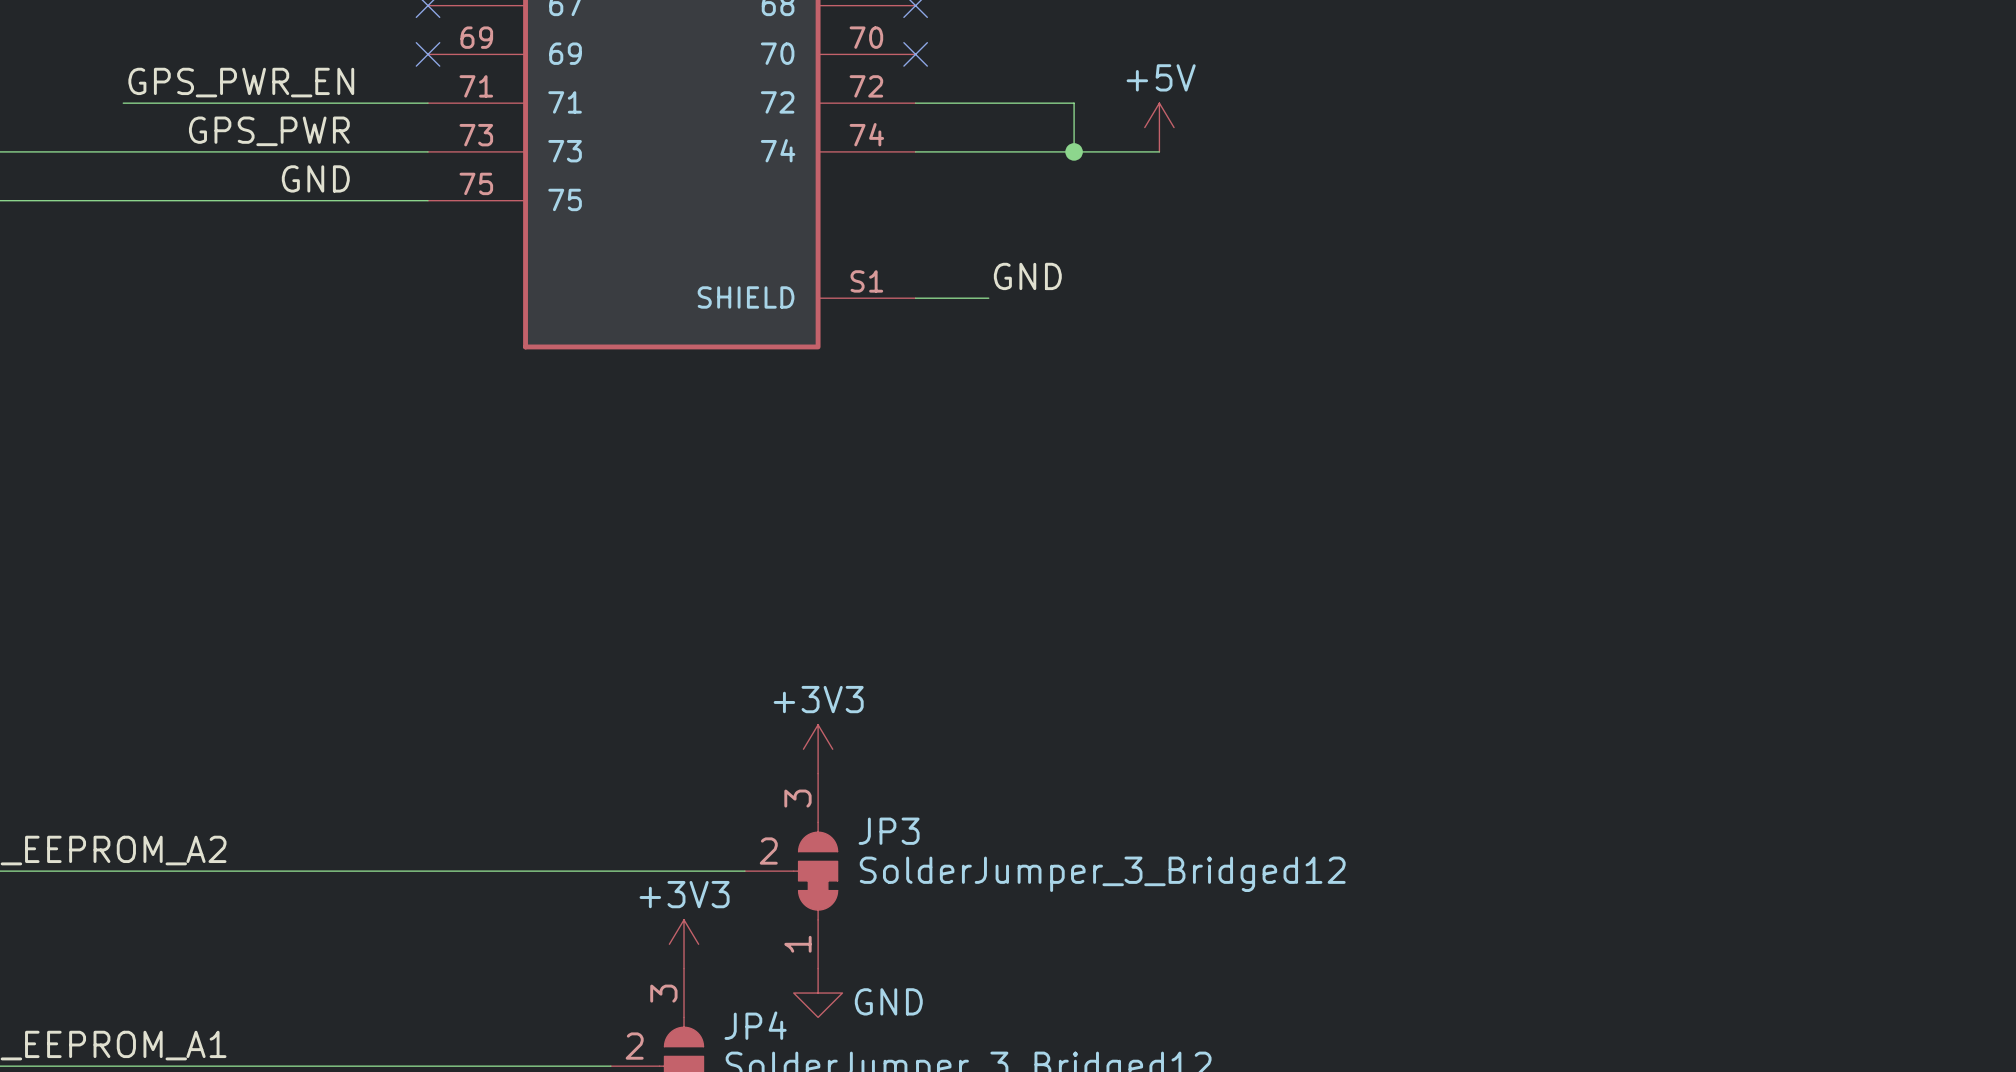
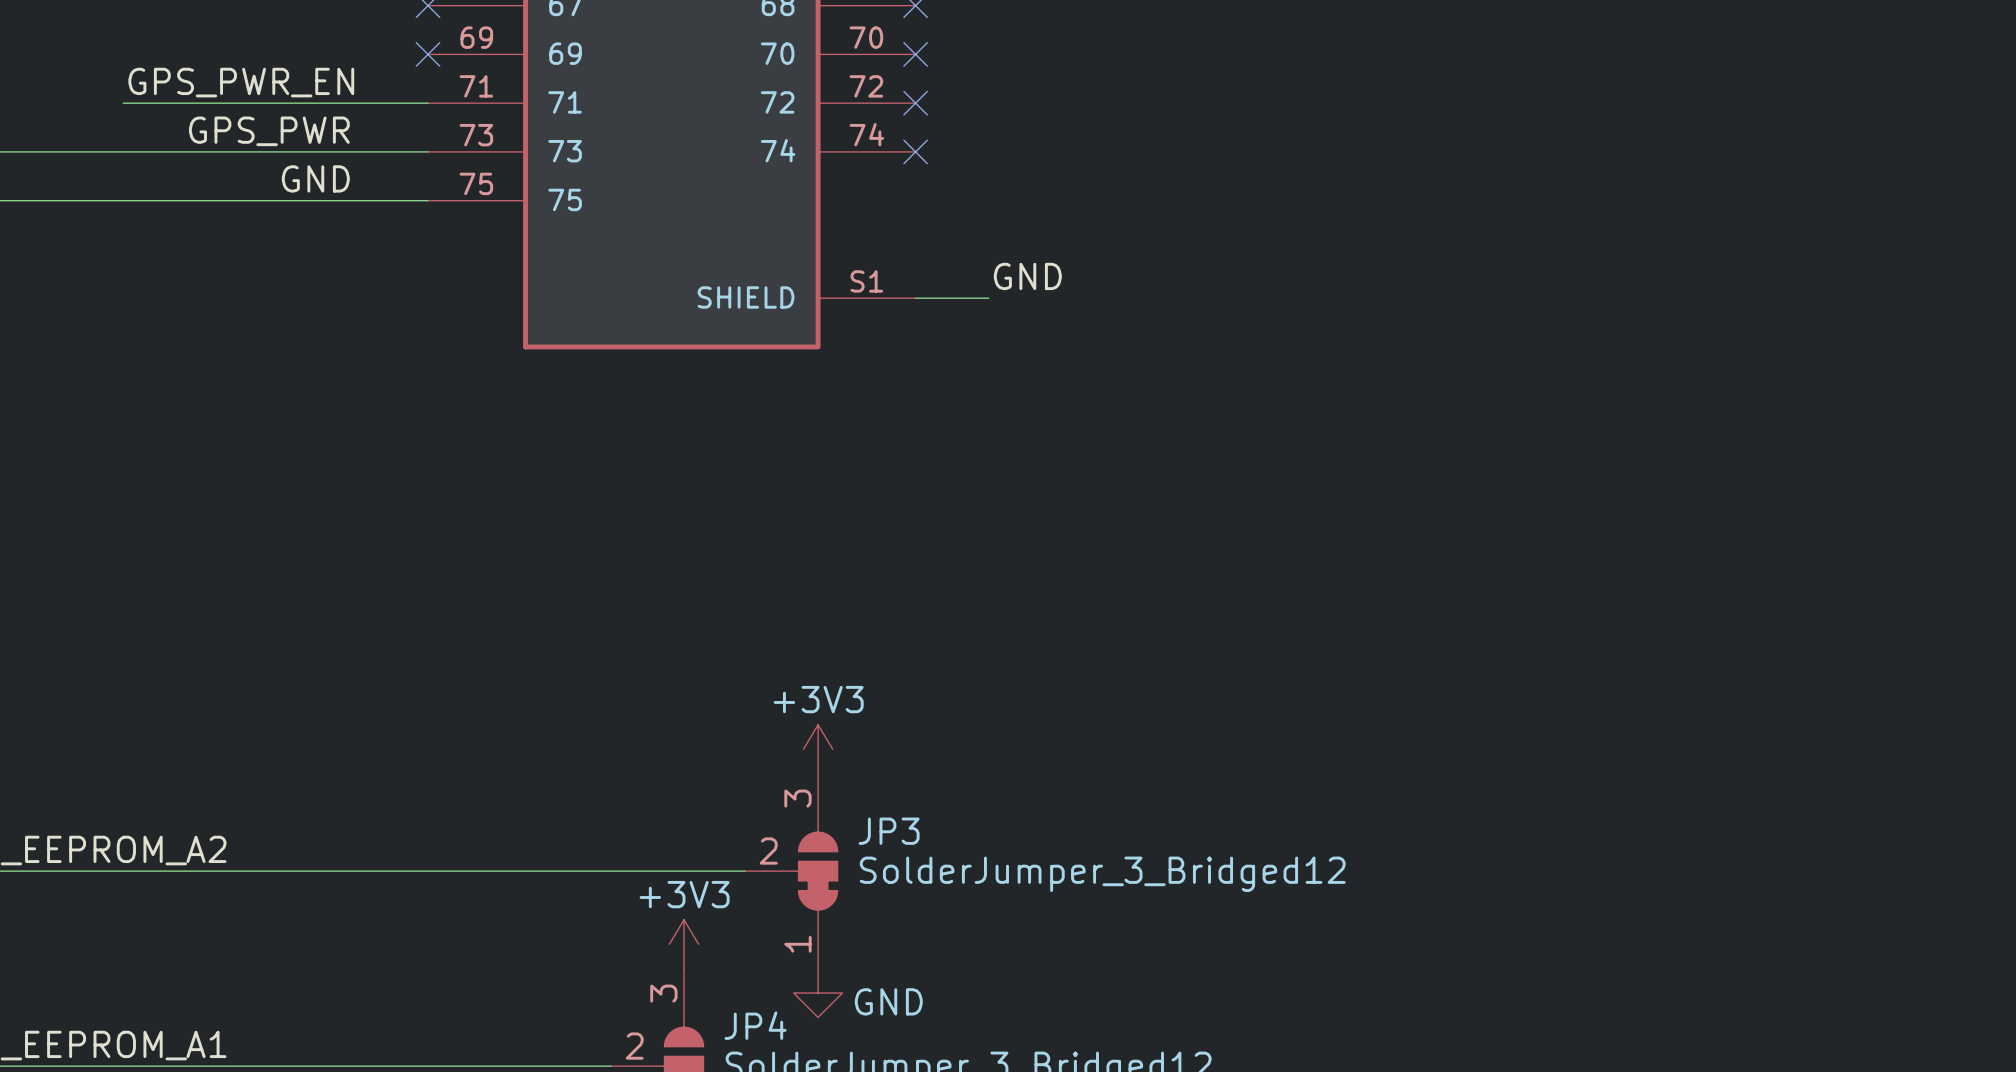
wire: (915, 103) (1074, 103) (1074, 151) -> none
no-connect mark: none -> (915, 103)
power symbol: +5V (1159, 127) -> none
wire: (915, 151) (1159, 151) -> none
no-connect mark: none -> (915, 151)
junction: (1074, 151) -> none

